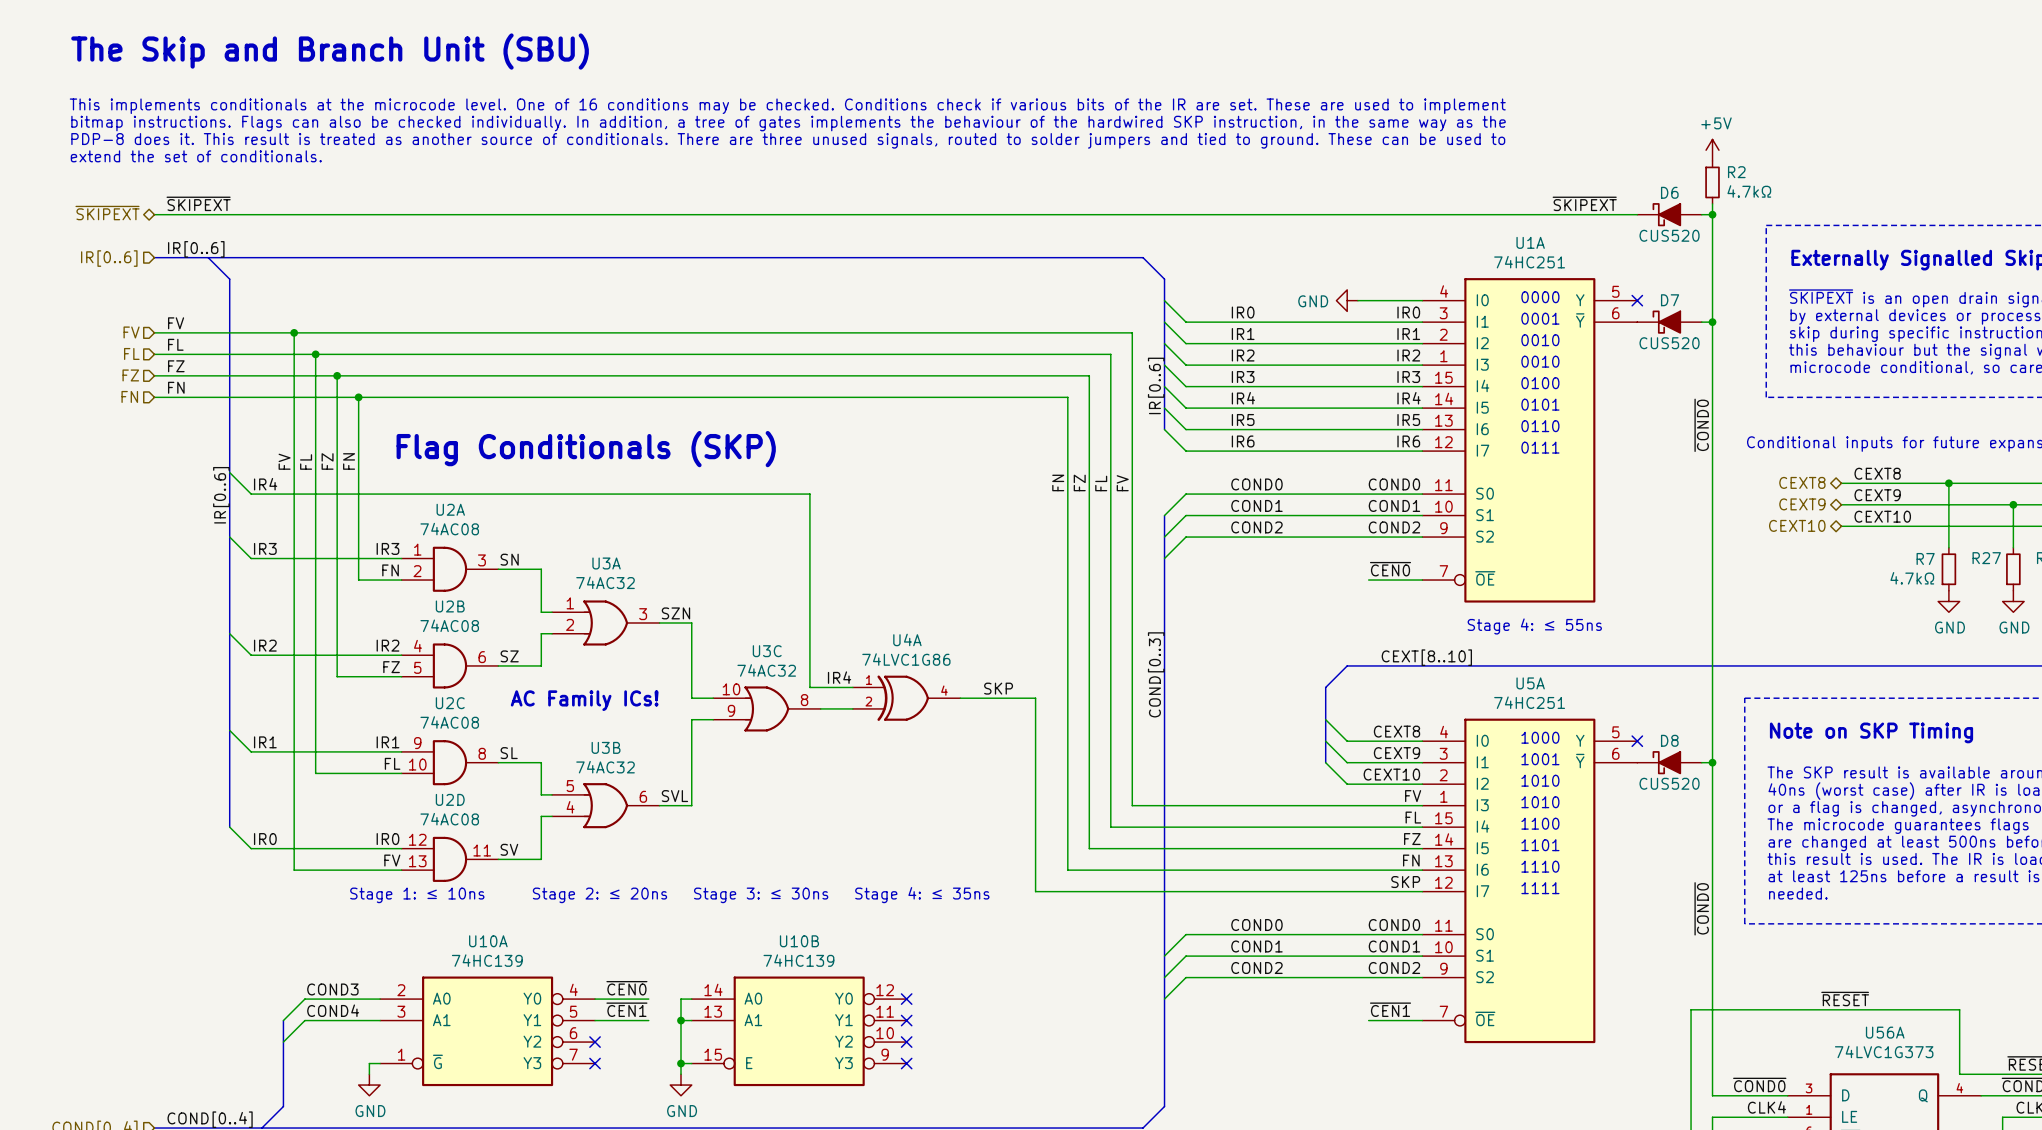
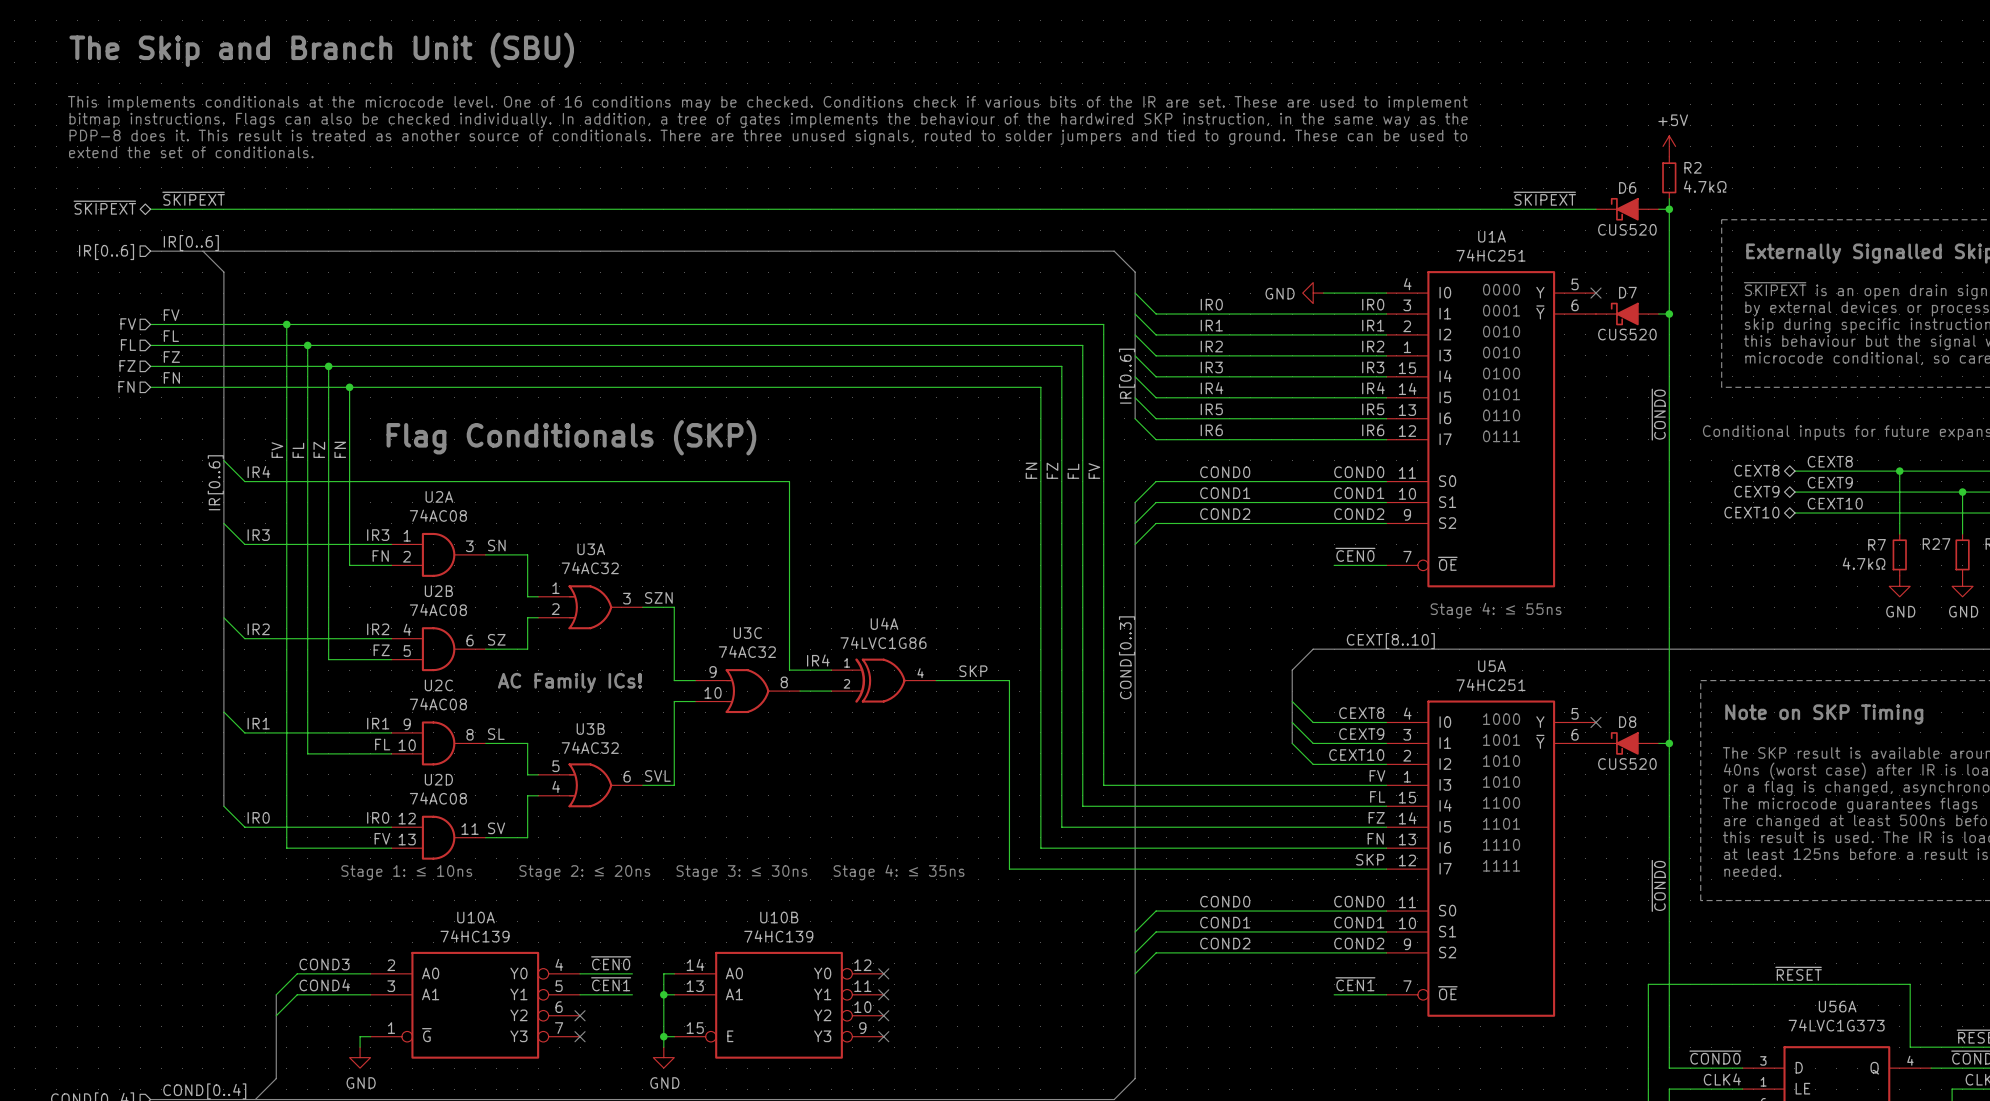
U3C flip: as is (766, 708) -> up-down (747, 691)

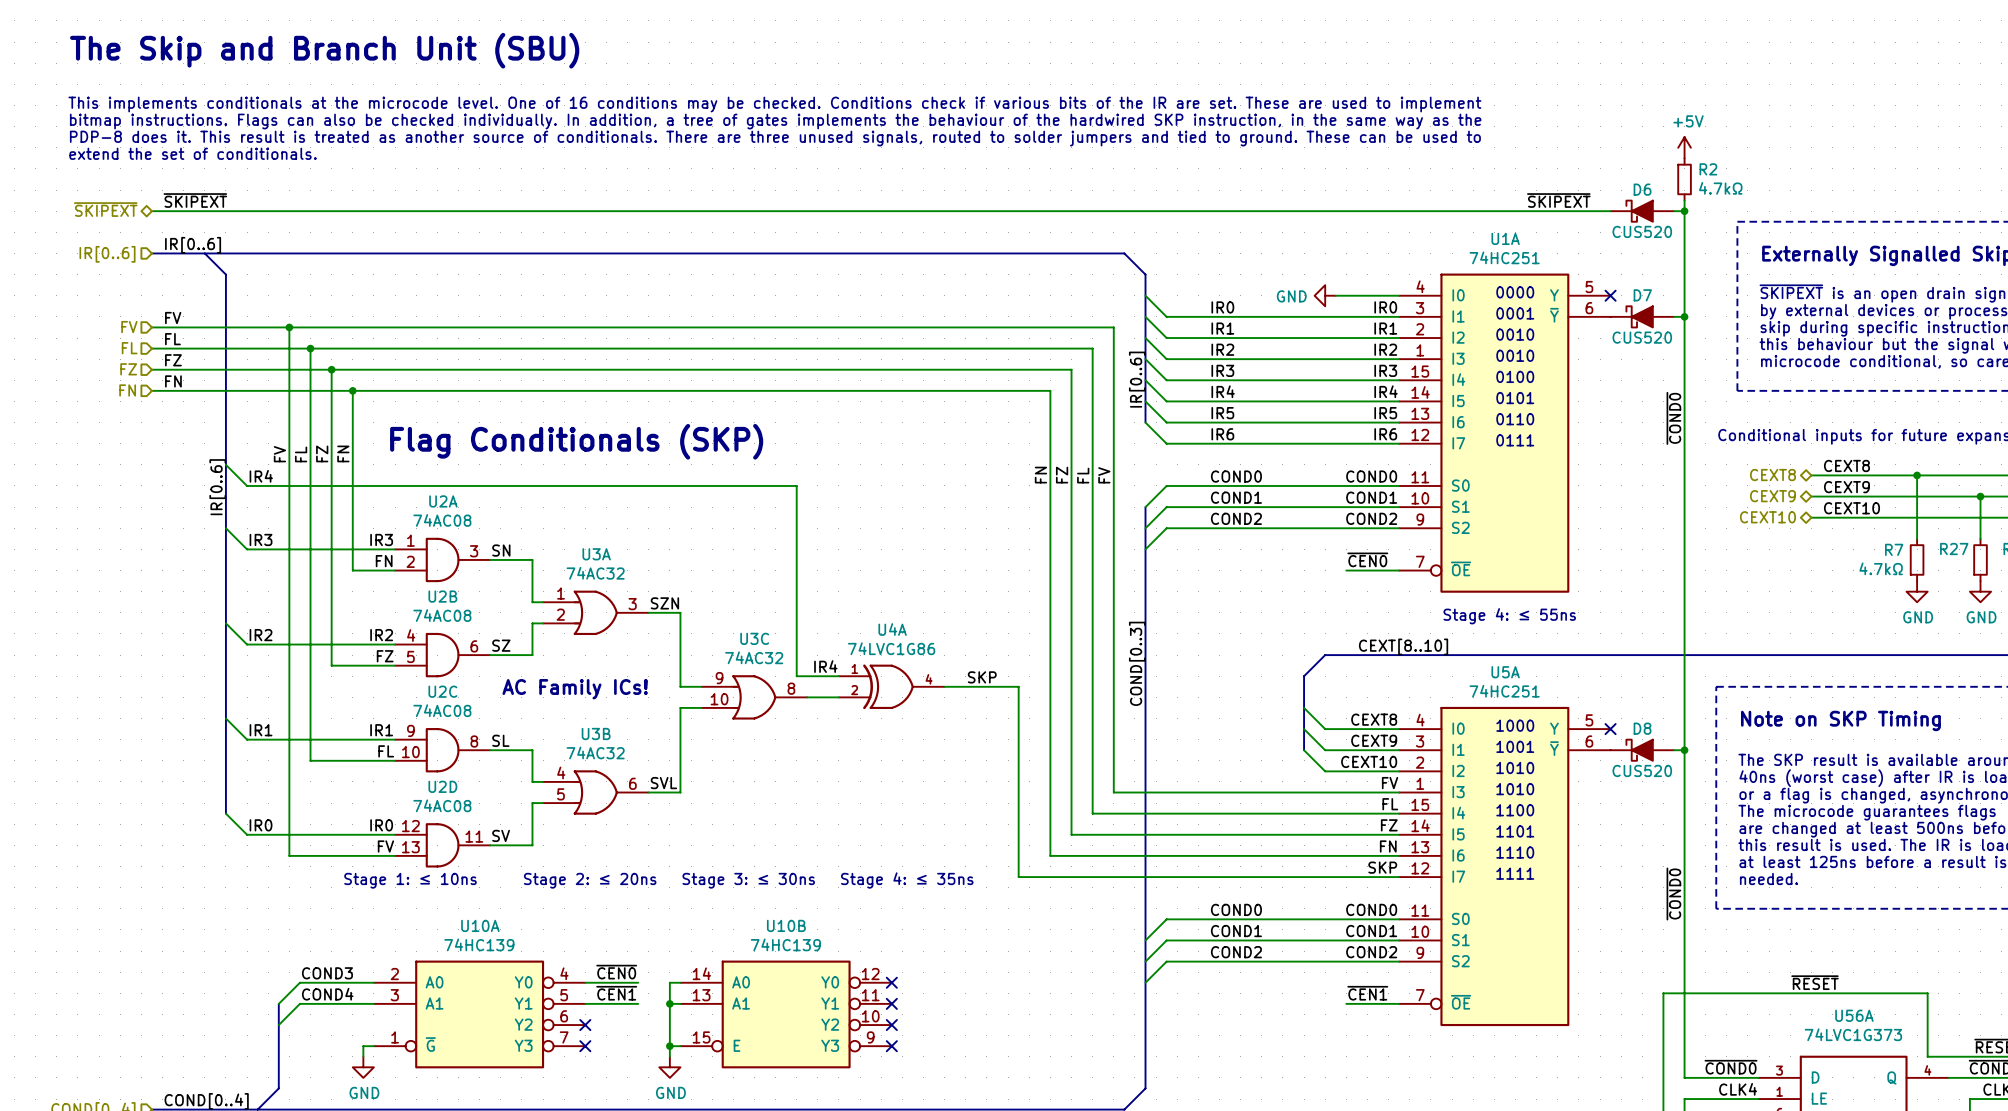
U3B flip: as is (590, 785) -> up-down (595, 792)

